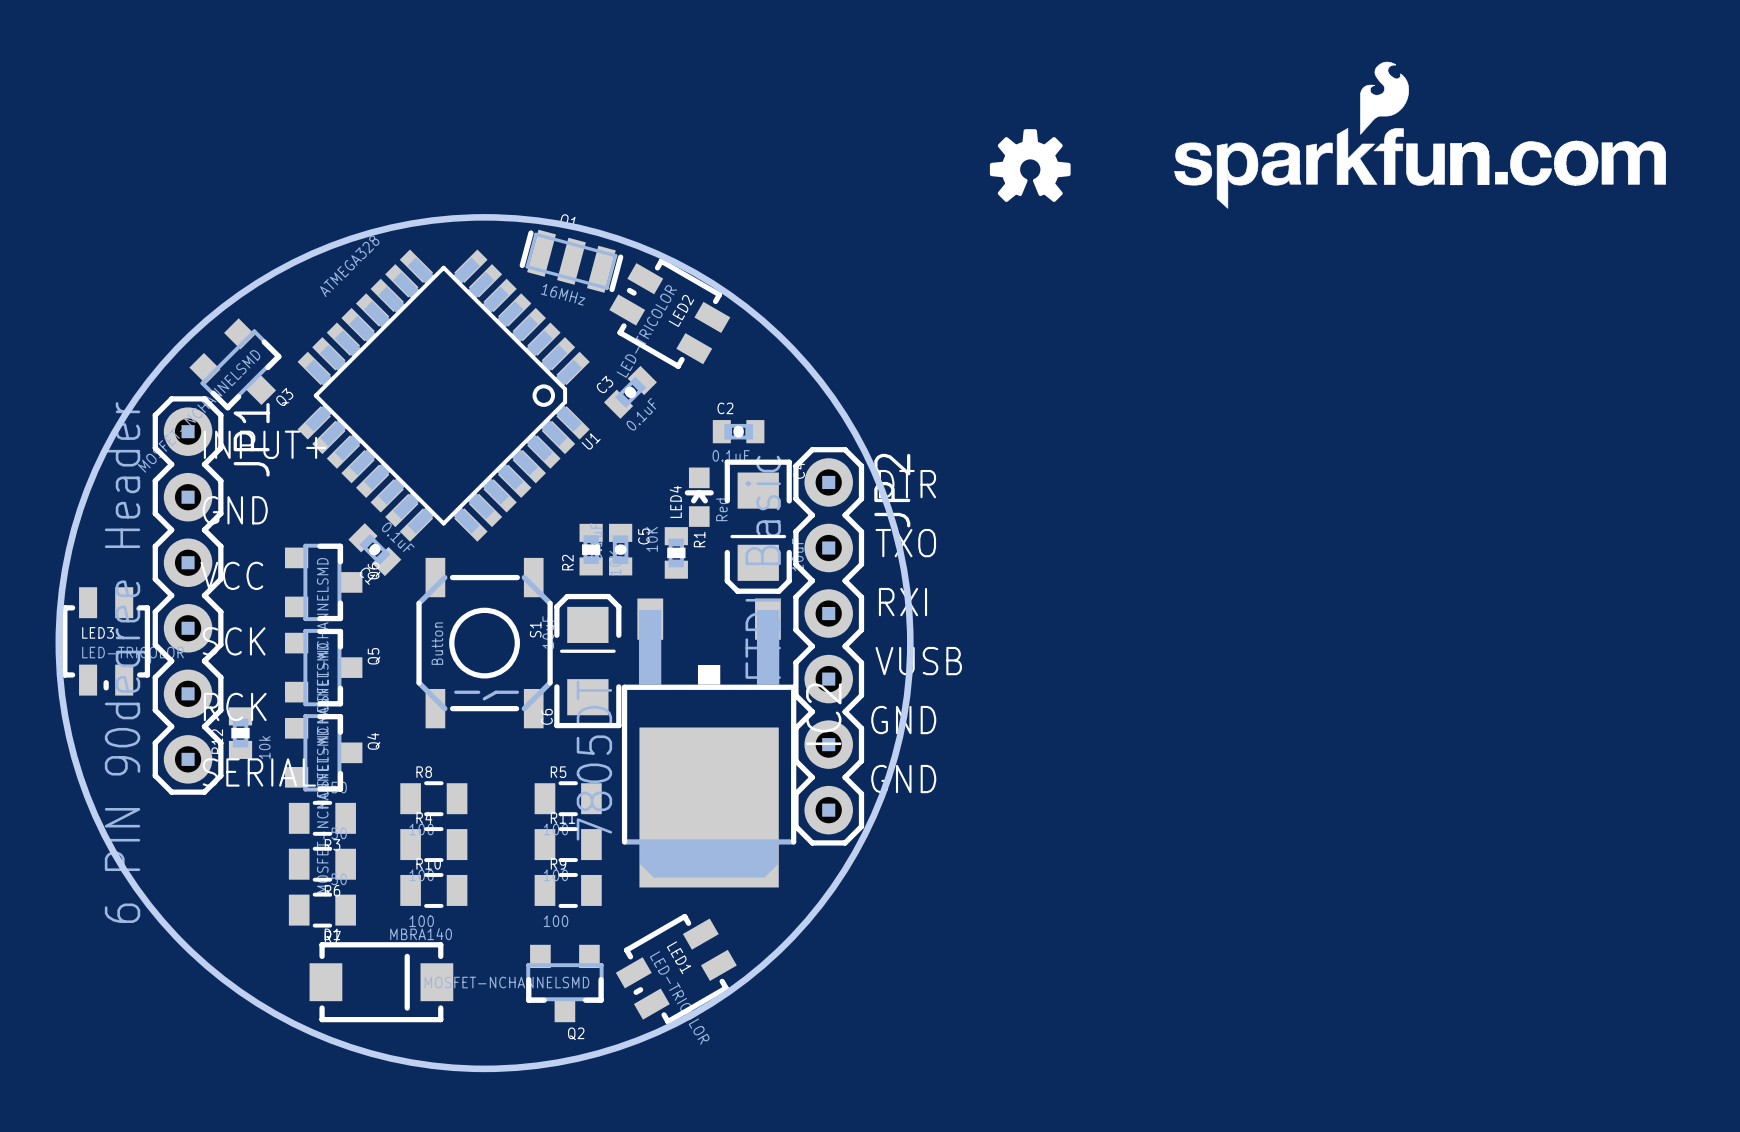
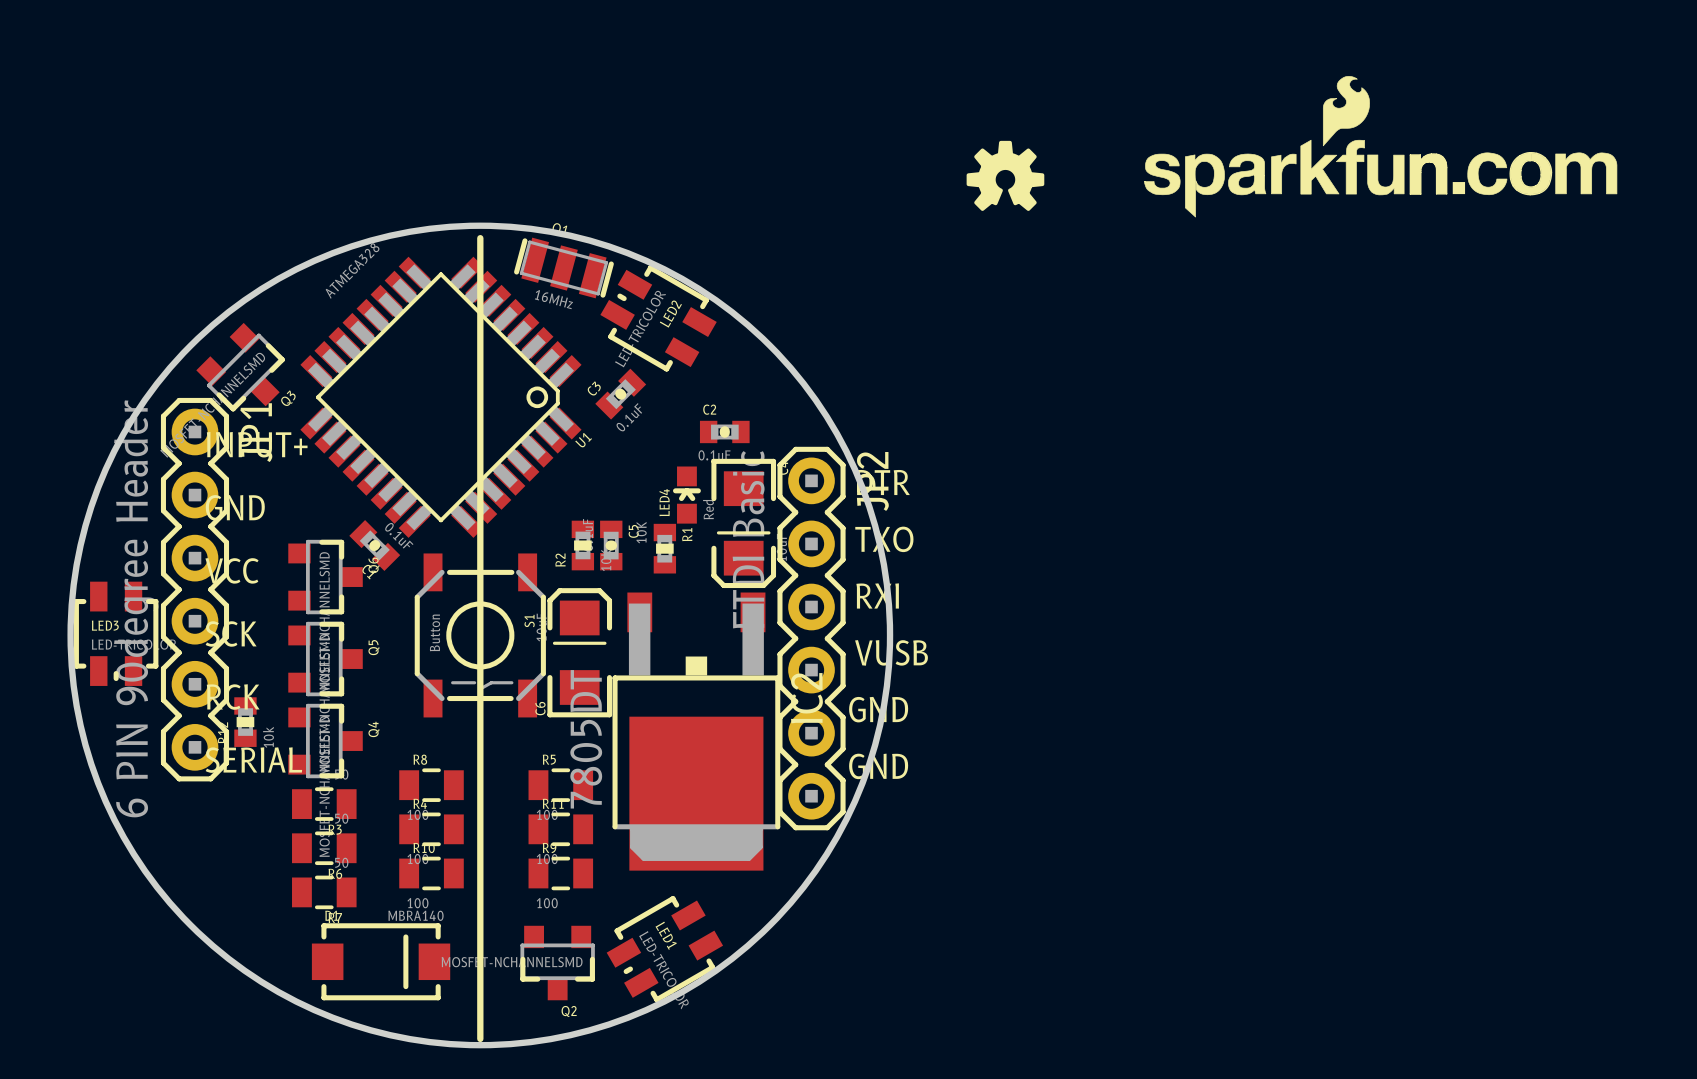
line: none -> (480, 238) (480, 1038)

